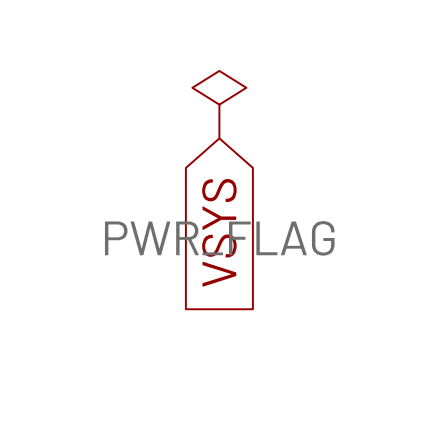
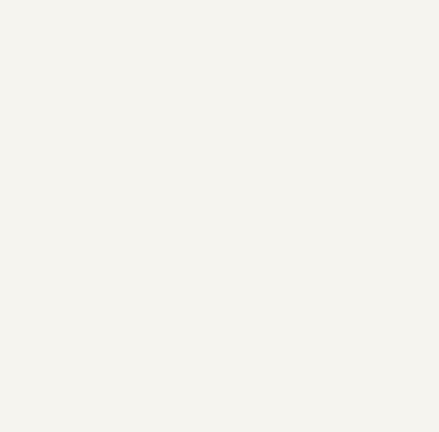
power symbol: PWR_FLAG (219, 104) -> none
global label: VSYS (219, 232) -> none

